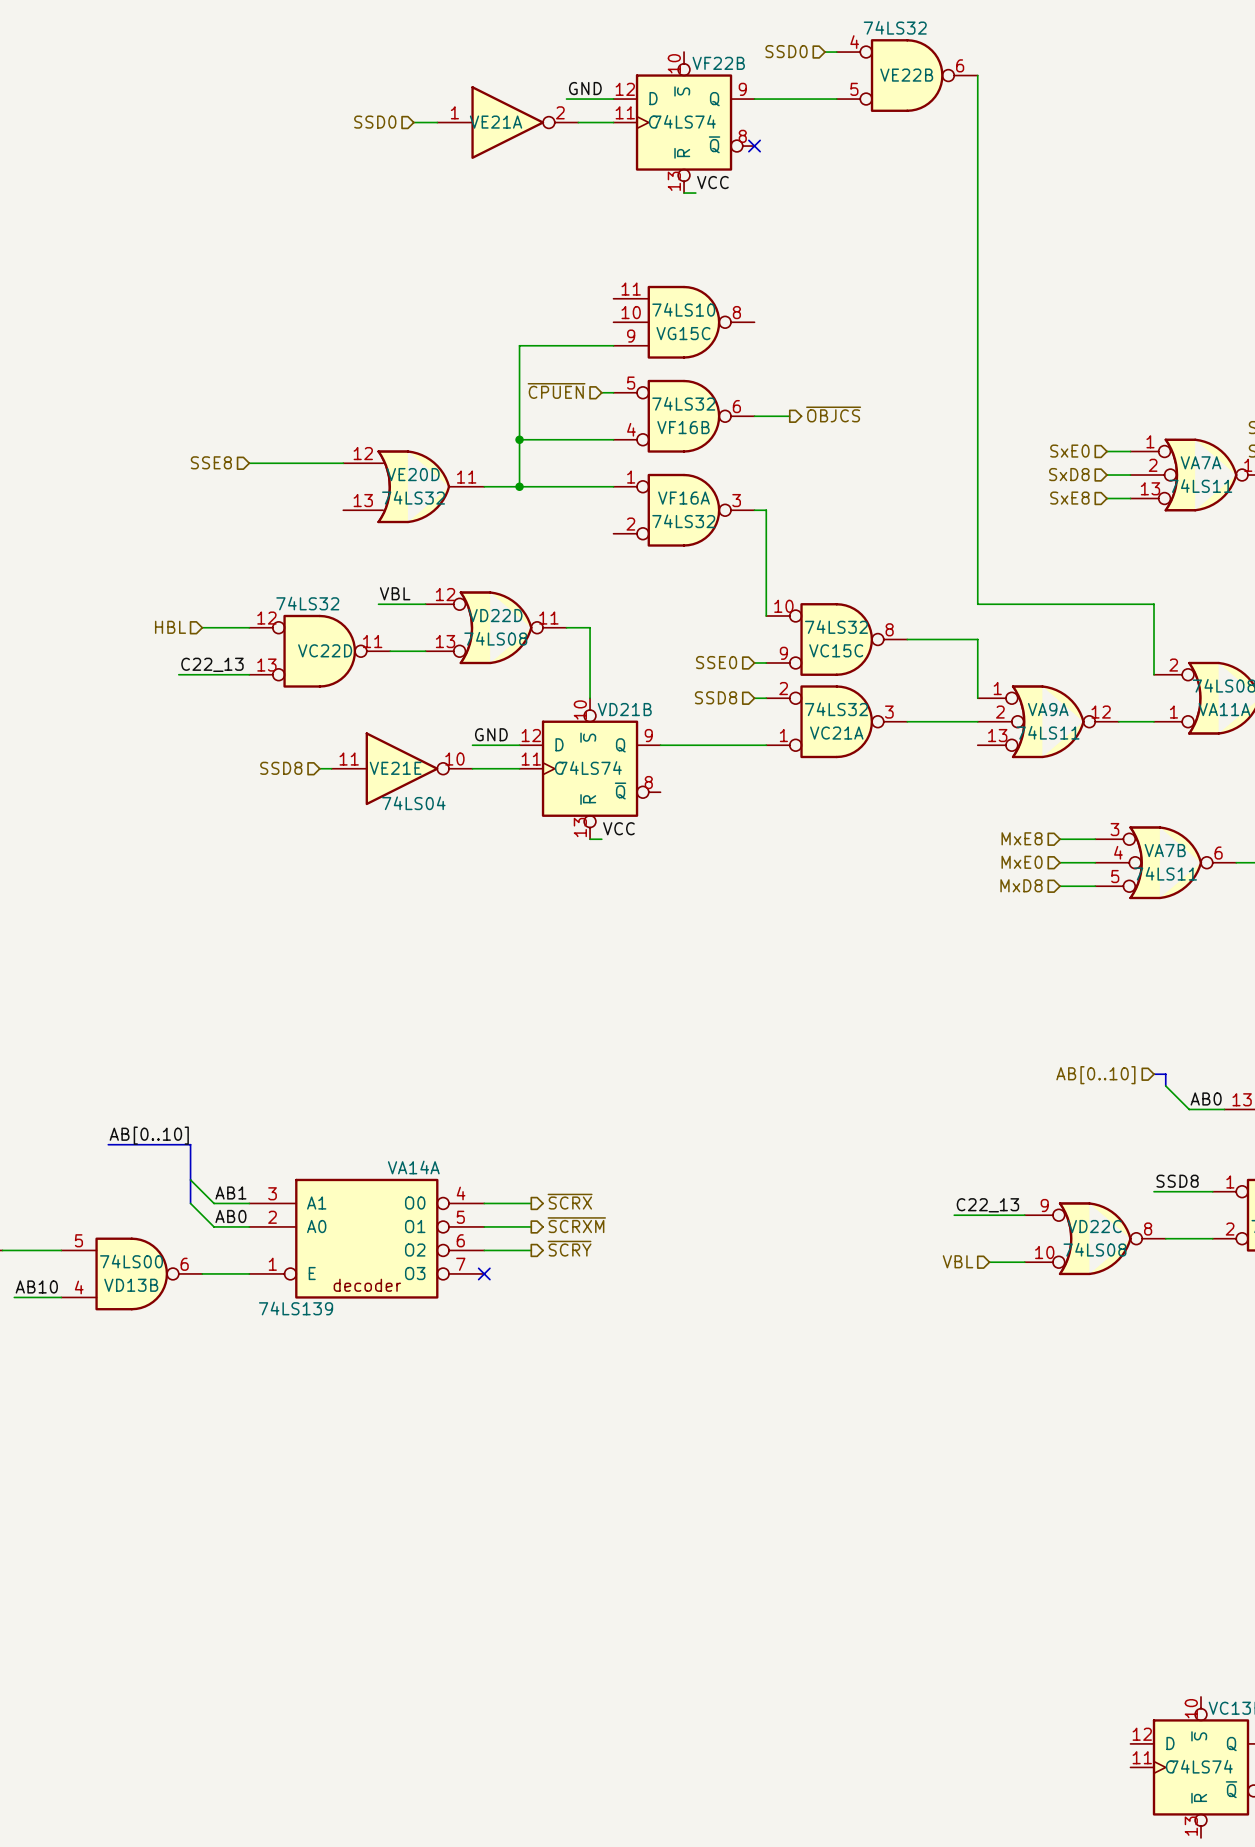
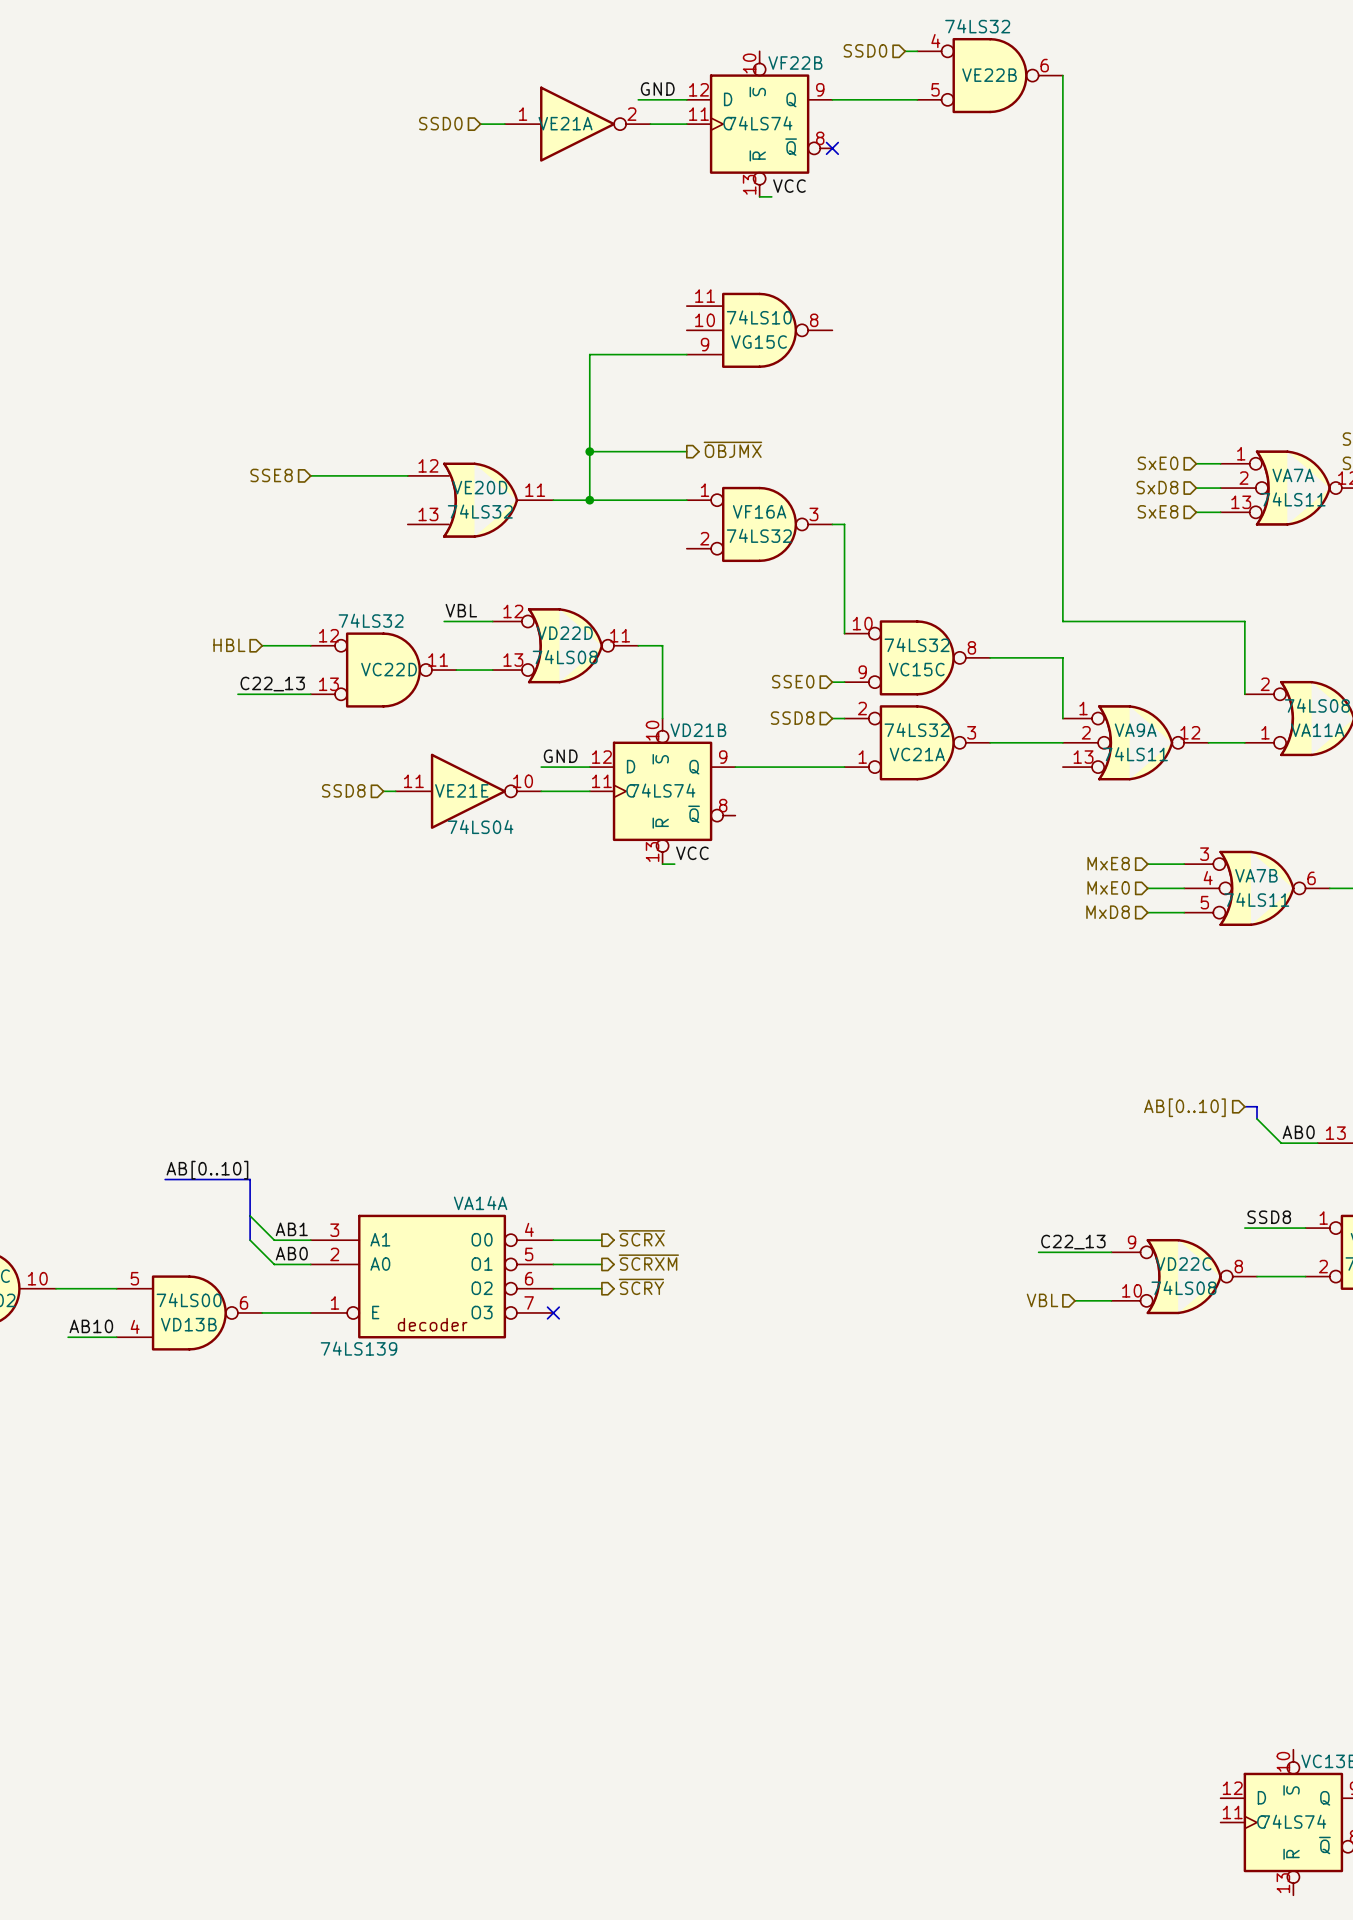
hierarchical label: ~{CPUEN} (556, 390) -> none
wire: (601, 392) (613, 392) -> none
hierarchical label: ~{OBJCS} (833, 414) -> none
VF16B: 74LS32 (684, 416) -> none
wire: (754, 416) (789, 416) -> none
hierarchical label: none -> ~{OBJMX} (732, 449)

